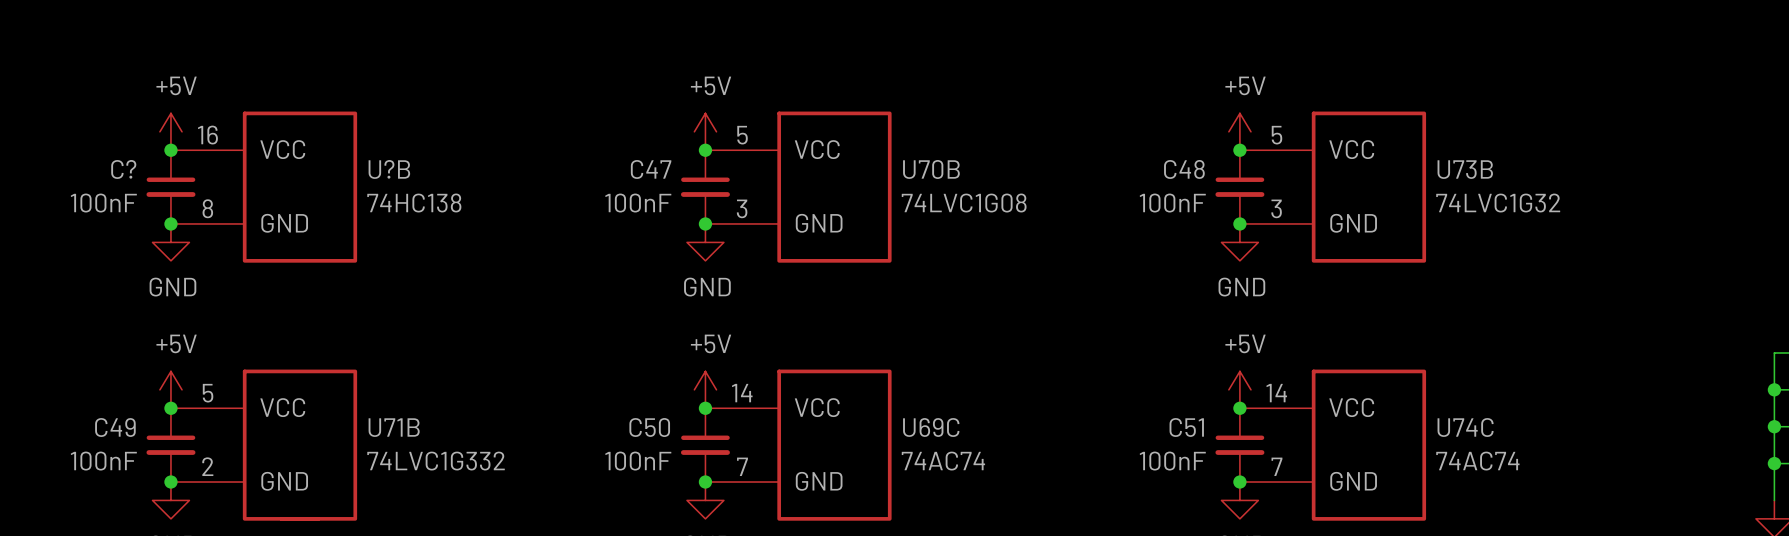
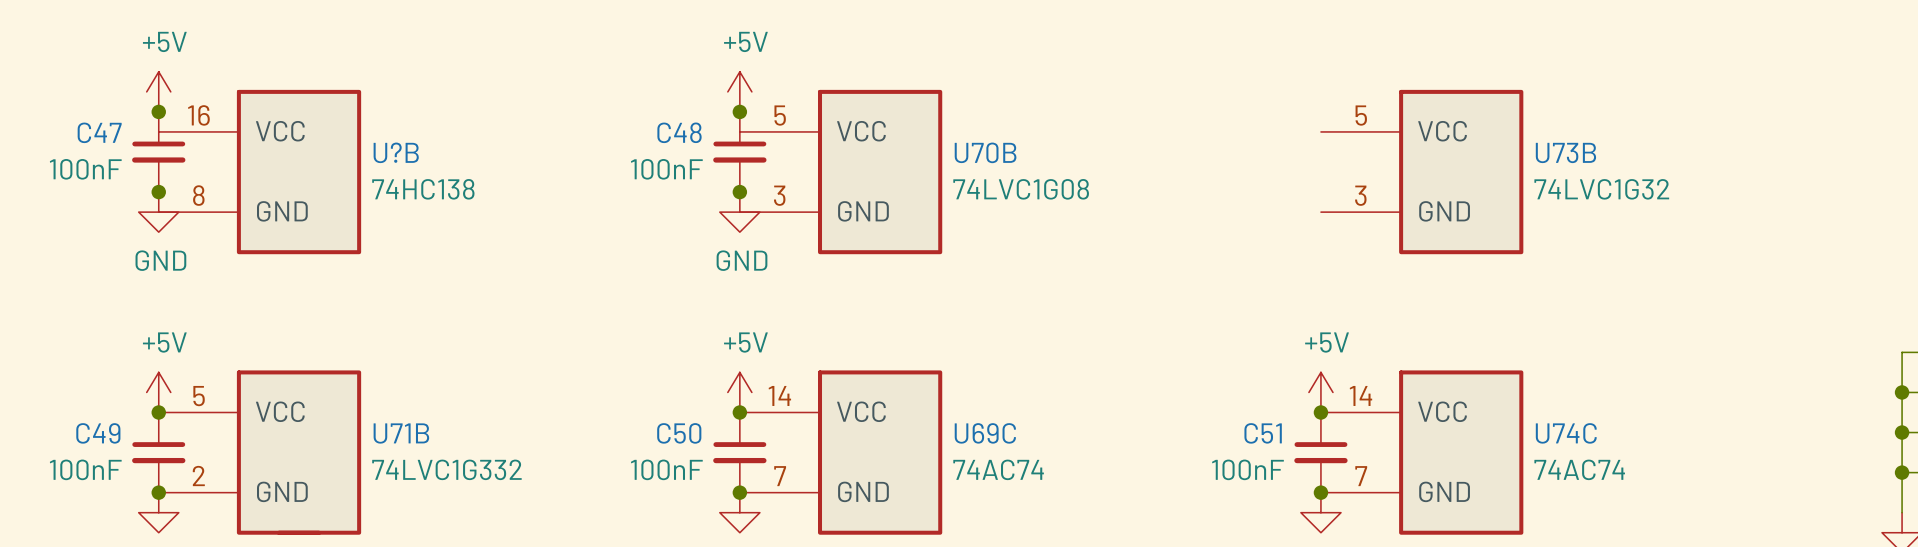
power symbol position: +5V (170, 131) -> +5V (158, 91)
power symbol position: +5V (705, 131) -> +5V (739, 91)
power symbol: +5V (1239, 131) -> none
junction position: (170, 150) -> (158, 111)
junction position: (705, 150) -> (739, 111)
junction: (1239, 150) -> none
C?: 100nF (170, 187) -> none
C47 position: (705, 187) -> (158, 152)
C48 position: (1239, 187) -> (739, 152)
junction position: (170, 223) -> (158, 192)
junction position: (705, 223) -> (739, 192)
junction: (1239, 223) -> none
power symbol position: GND (170, 242) -> GND (158, 212)
power symbol position: GND (705, 242) -> GND (739, 212)
power symbol: GND (1239, 242) -> none

